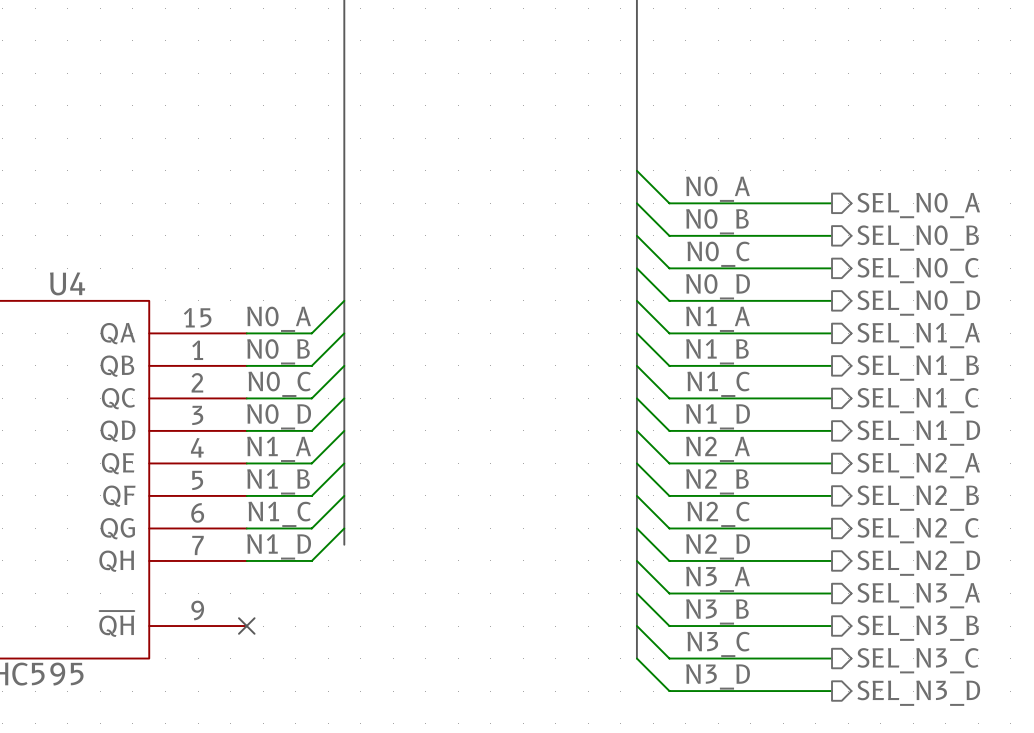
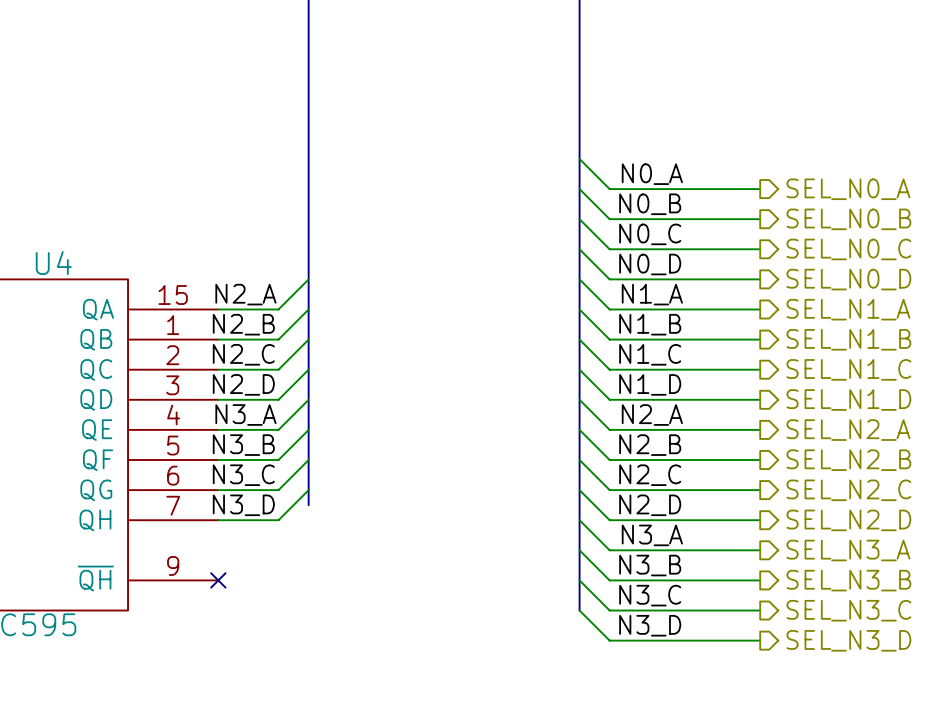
label: N0_A (279, 319) -> N2_A (245, 294)
label: N0_B (278, 351) -> N2_B (243, 324)
label: N0_C (279, 384) -> N2_C (243, 354)
label: N0_D (279, 416) -> N2_D (243, 384)
label: N1_A (279, 449) -> N3_A (245, 415)
label: N1_B (278, 481) -> N3_B (243, 445)
label: N1_C (279, 514) -> N3_C (243, 475)
label: N1_D (279, 546) -> N3_D (243, 505)

